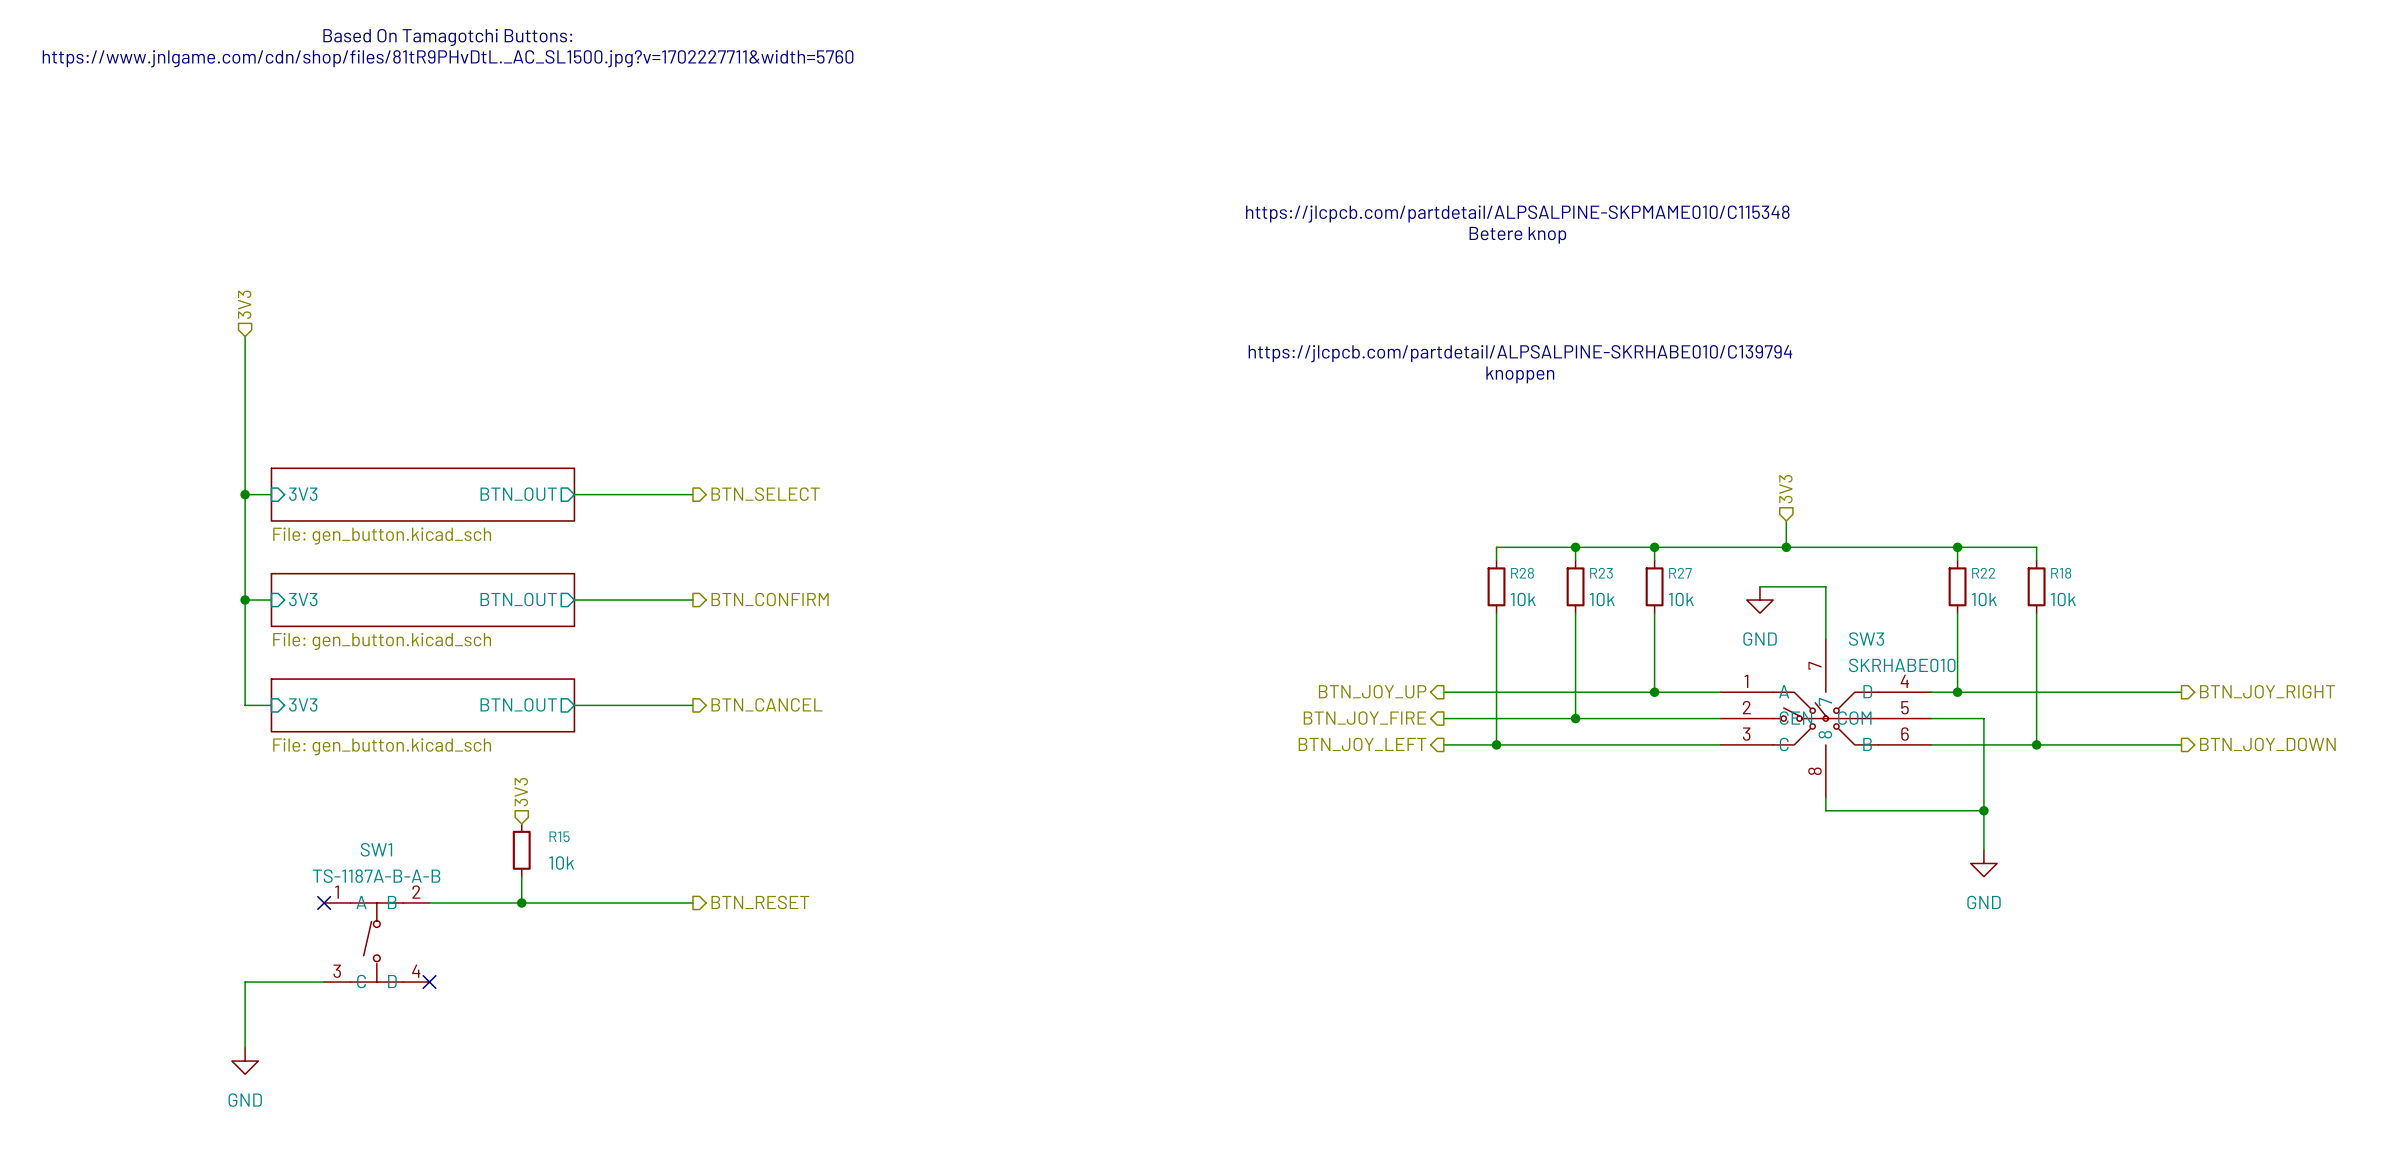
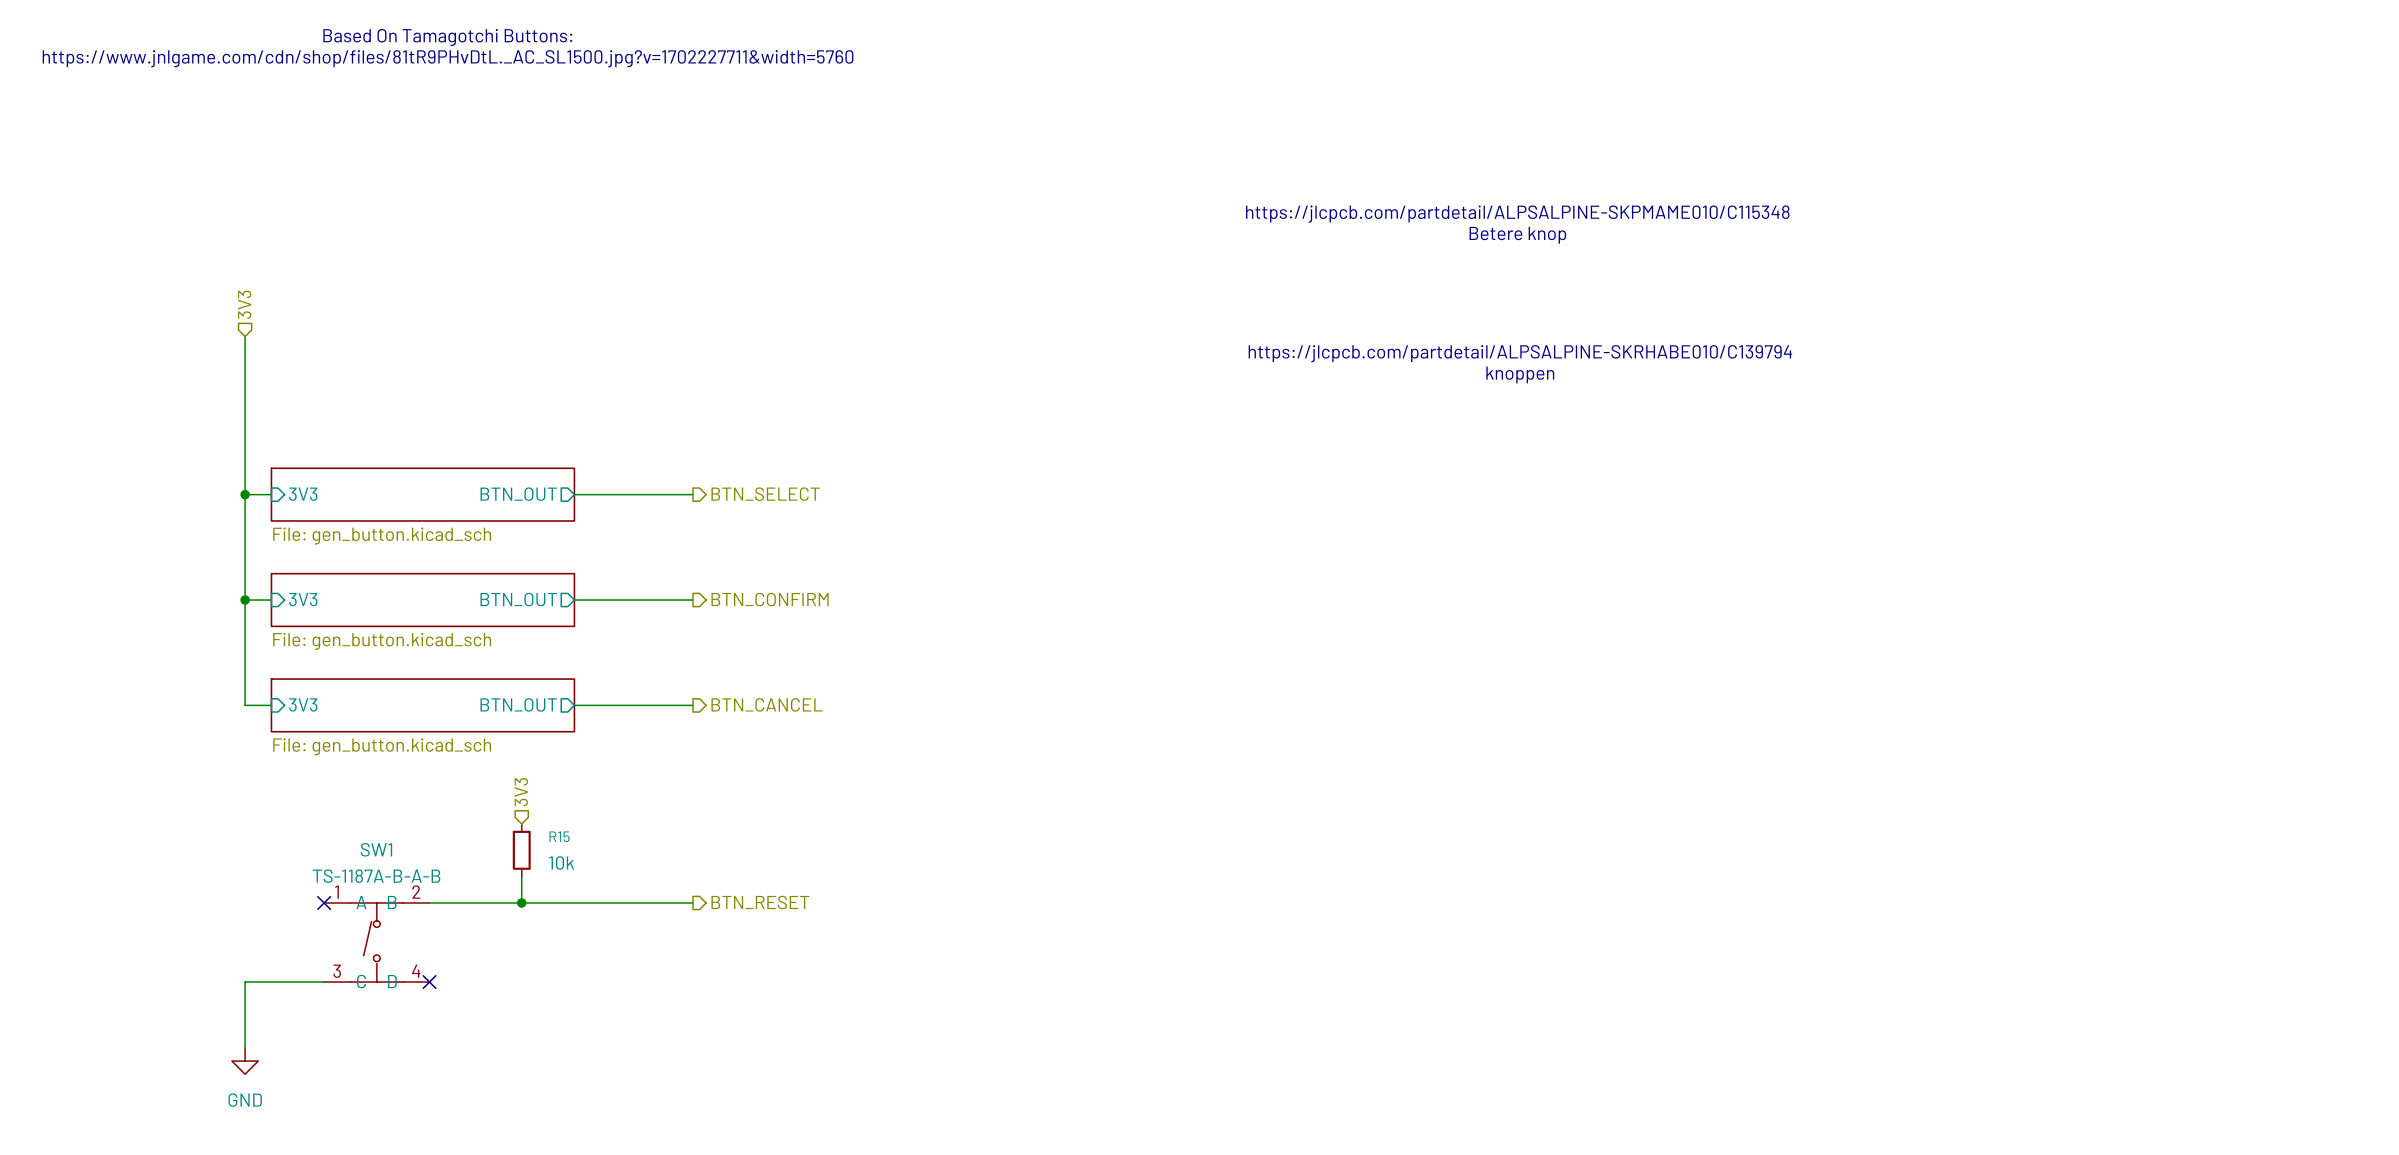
hierarchical label: 3V3 (1785, 489) -> none
wire: (1786, 520) (1786, 547) -> none
wire: (1575, 547) (1575, 560) -> none
junction: (1575, 547) -> none
wire: (1654, 547) (1654, 560) -> none
junction: (1654, 547) -> none
junction: (1786, 547) -> none
wire: (1957, 547) (1957, 560) -> none
junction: (1957, 547) -> none
wire: (1496, 560) (1496, 547) (2036, 547) (2036, 560) -> none
R28: 10k (1496, 586) -> none
R23: 10k (1575, 586) -> none
R27: 10k (1654, 586) -> none
wire: (1759, 586) (1825, 586) (1825, 639) -> none
R22: 10k (1957, 586) -> none
R18: 10k (2036, 586) -> none
power symbol: GND (1759, 600) -> none
wire: (1496, 613) (1496, 744) -> none
wire: (1575, 613) (1575, 718) -> none
wire: (1654, 613) (1654, 692) -> none
wire: (1957, 613) (1957, 692) -> none
wire: (2036, 613) (2036, 744) -> none
hierarchical label: BTN_JOY_UP (1372, 691) -> none
hierarchical label: BTN_JOY_RIGHT (2267, 691) -> none
wire: (1443, 692) (1720, 692) -> none
junction: (1654, 692) -> none
wire: (1931, 692) (2181, 692) -> none
junction: (1957, 692) -> none
hierarchical label: BTN_JOY_FIRE (1364, 718) -> none
wire: (1443, 718) (1720, 718) -> none
junction: (1575, 718) -> none
SW3: SKRHABE010 (1825, 718) -> none
wire: (1931, 718) (1983, 718) (1983, 850) -> none
hierarchical label: BTN_JOY_LEFT (1362, 744) -> none
wire: (1443, 744) (1720, 744) -> none
junction: (1496, 744) -> none
wire: (1931, 744) (2181, 744) -> none
junction: (2036, 744) -> none
hierarchical label: BTN_JOY_DOWN (2267, 744) -> none
wire: (1825, 797) (1825, 810) (1983, 810) -> none
junction: (1983, 810) -> none
power symbol: GND (1983, 863) -> none

